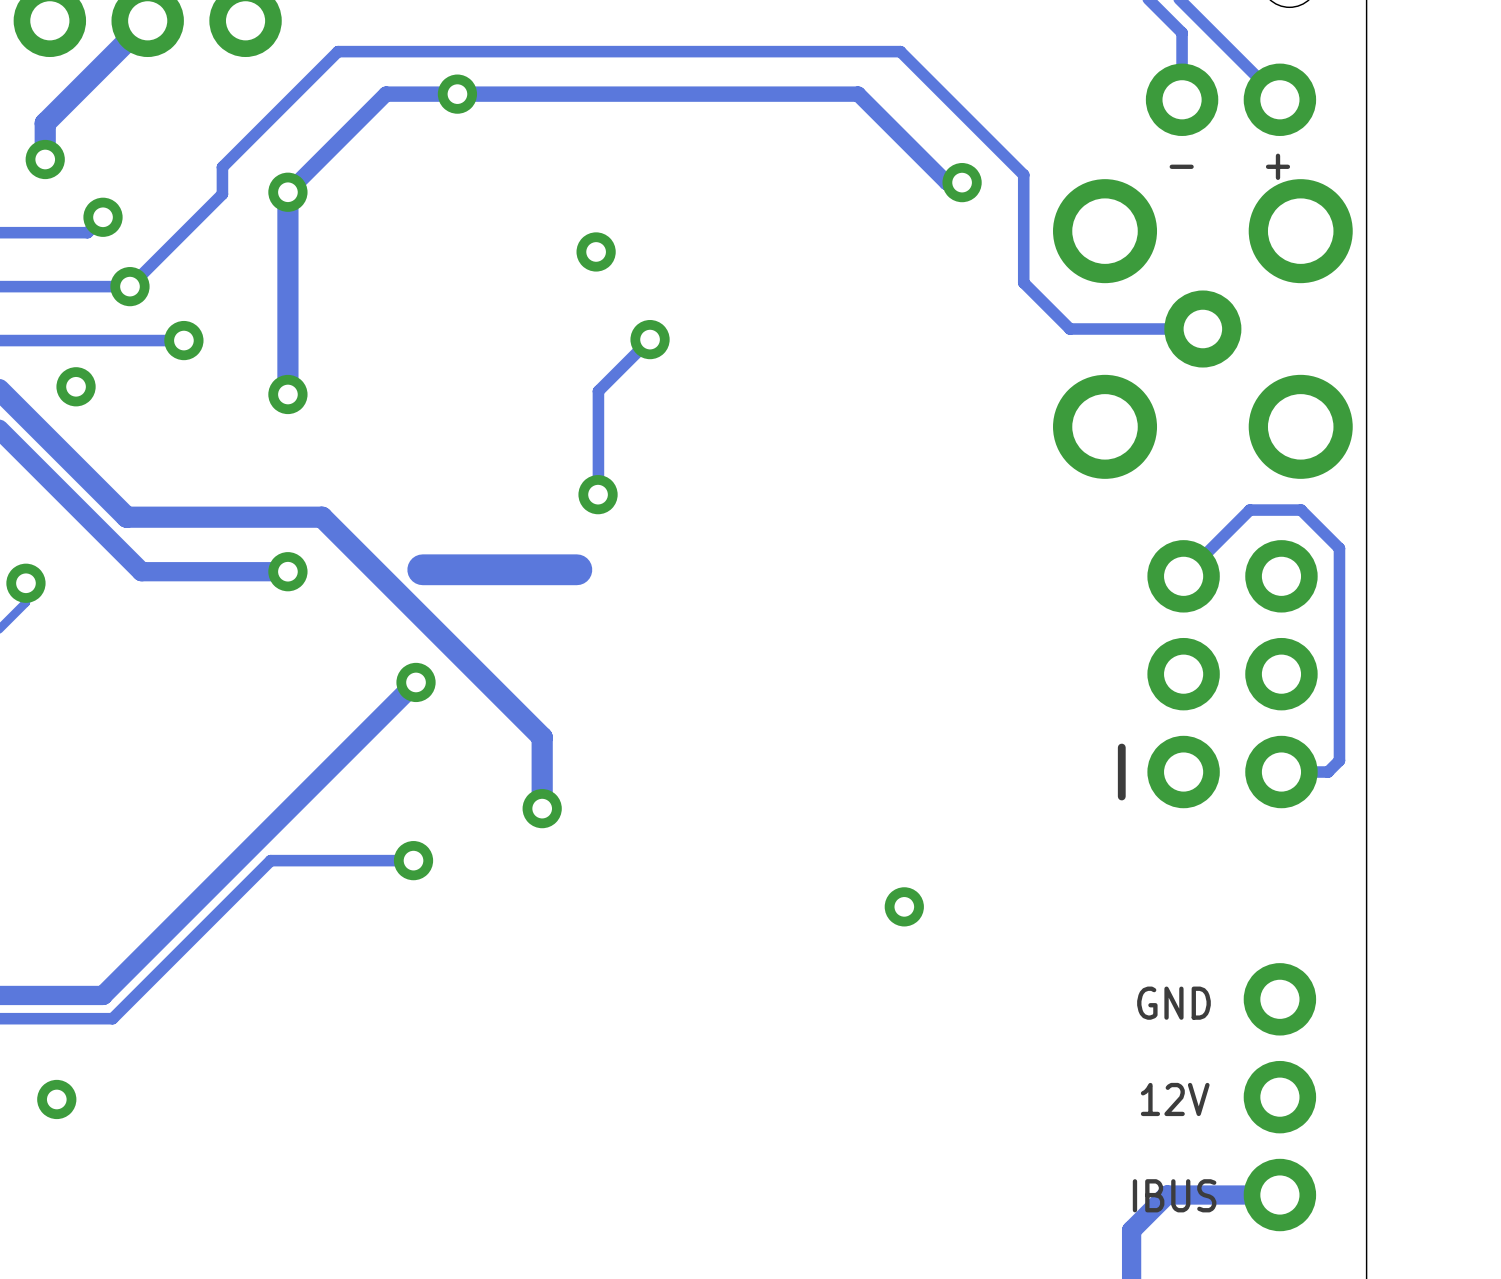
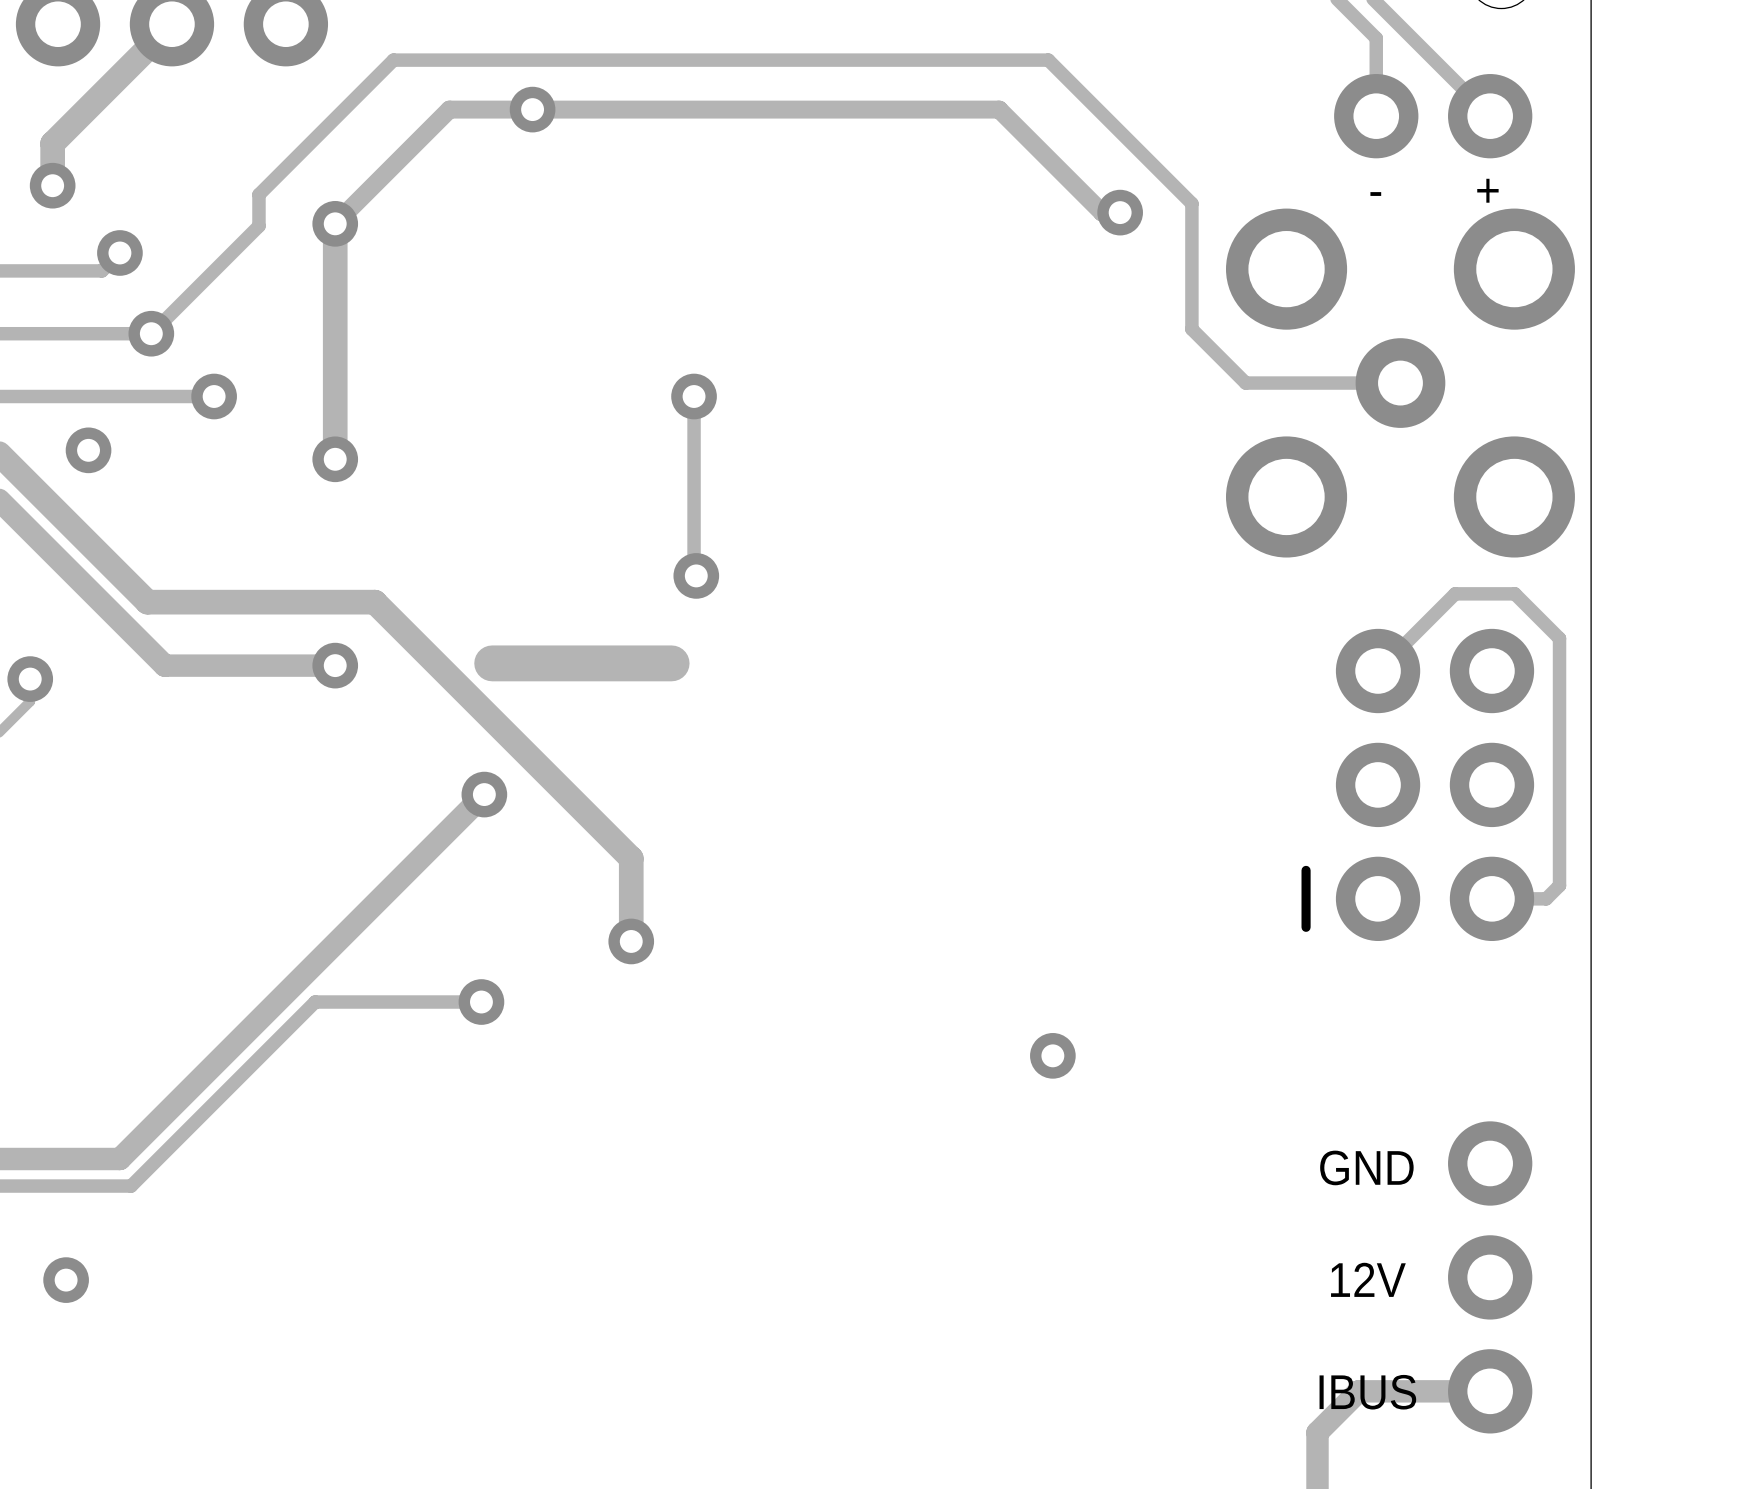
via: (596, 251) -> none
track: (650, 339) (598, 391) (598, 494) -> none
via: (650, 339) -> none
track: none -> (694, 396) (694, 575)
via: none -> (694, 396)

